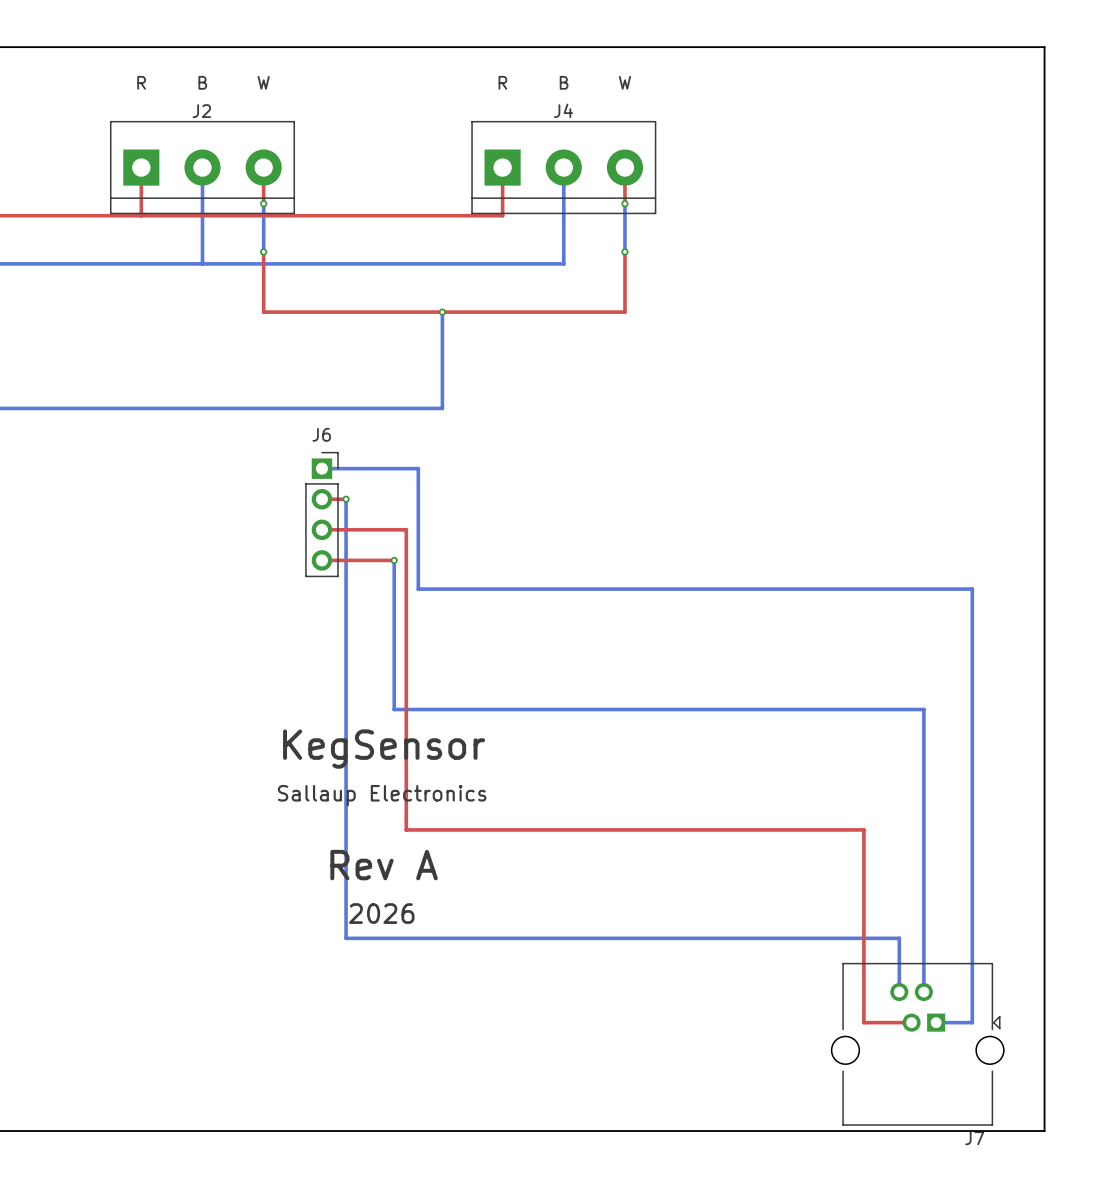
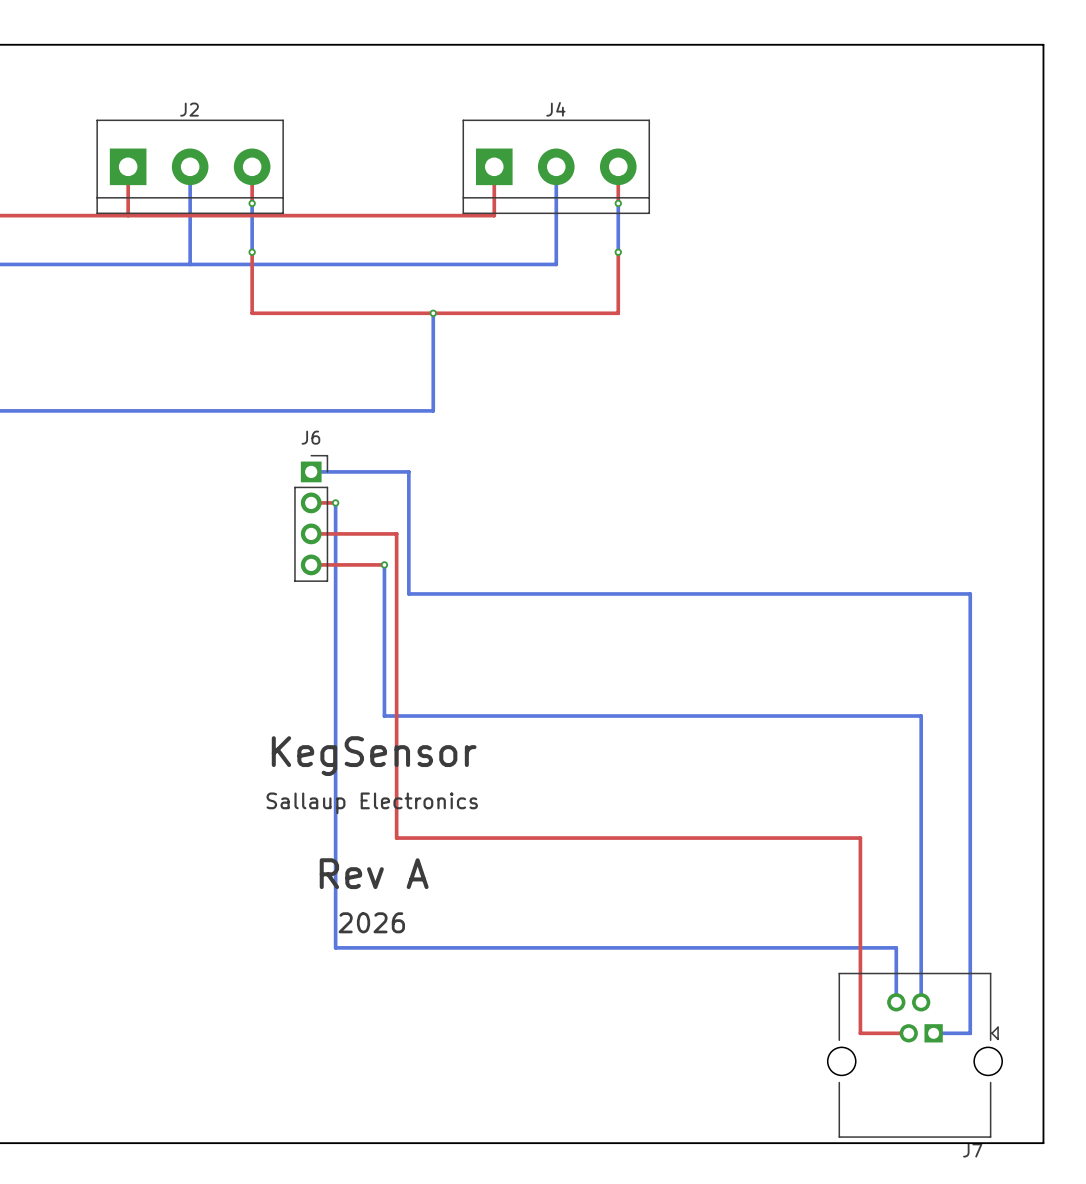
text: R (141, 82) -> none
text: B (202, 82) -> none
text: W (263, 82) -> none
text: R (502, 82) -> none
text: B (564, 82) -> none
text: W (624, 82) -> none

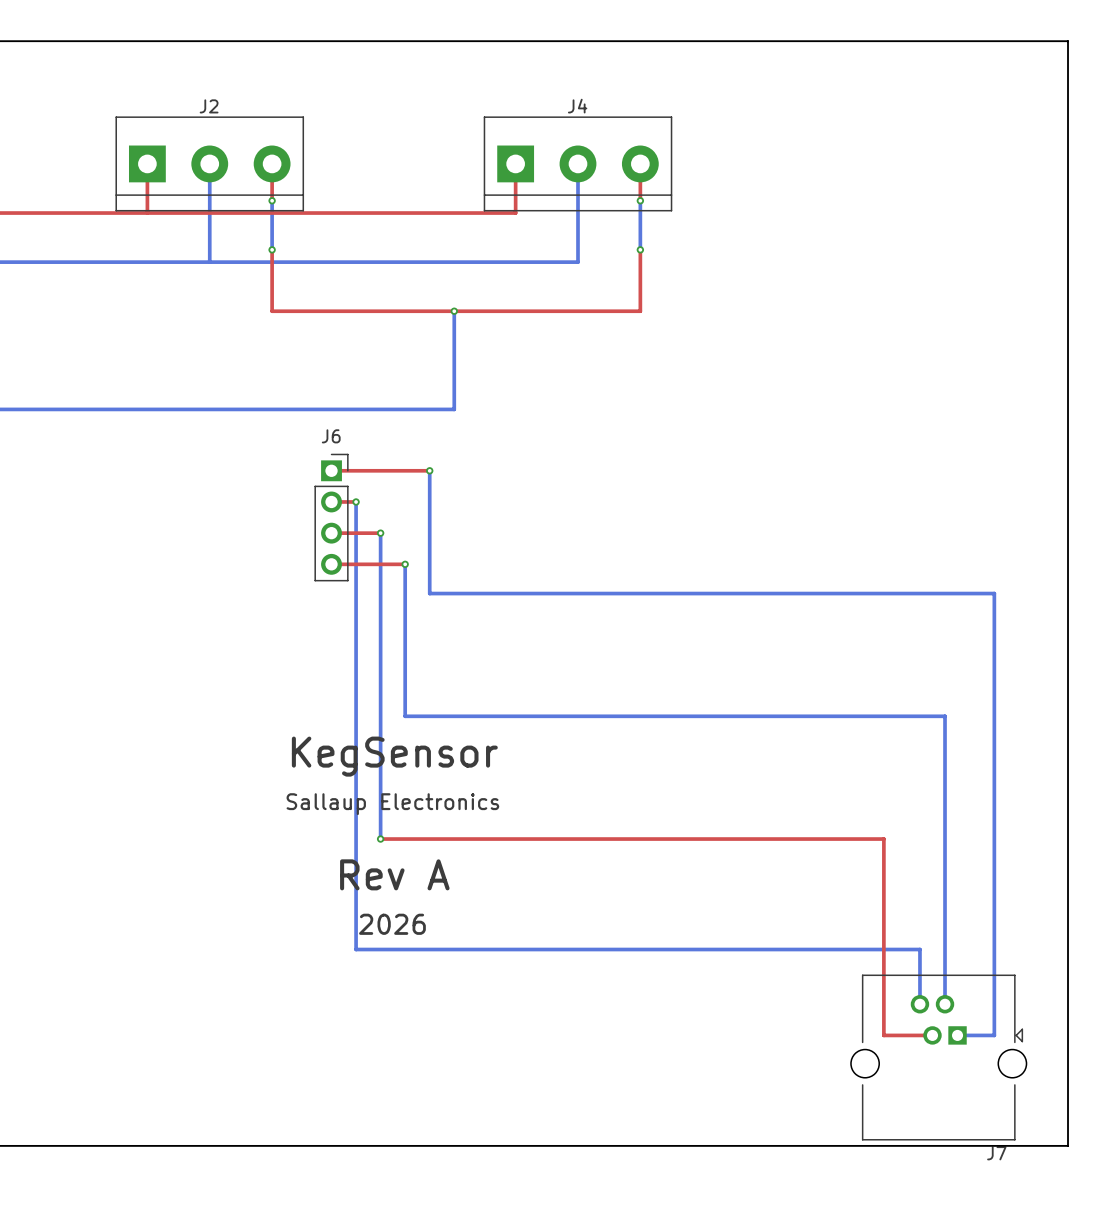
top track: none -> (331, 470) (429, 470)
bottom track: (311, 471) (408, 471) -> none
via: none -> (429, 470)
top track: (360, 533) (396, 533) (396, 838) -> (380, 839) (417, 839)
bottom track: none -> (380, 533) (380, 839)
via: none -> (380, 533)
via: none -> (380, 839)

